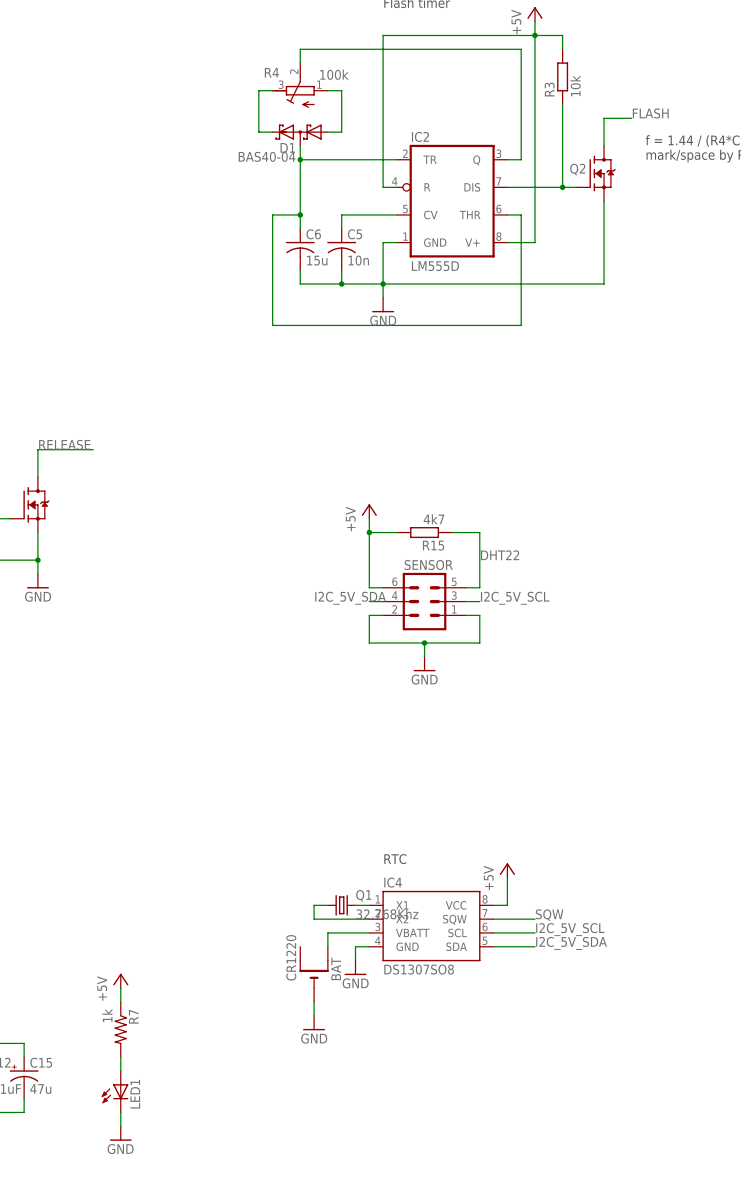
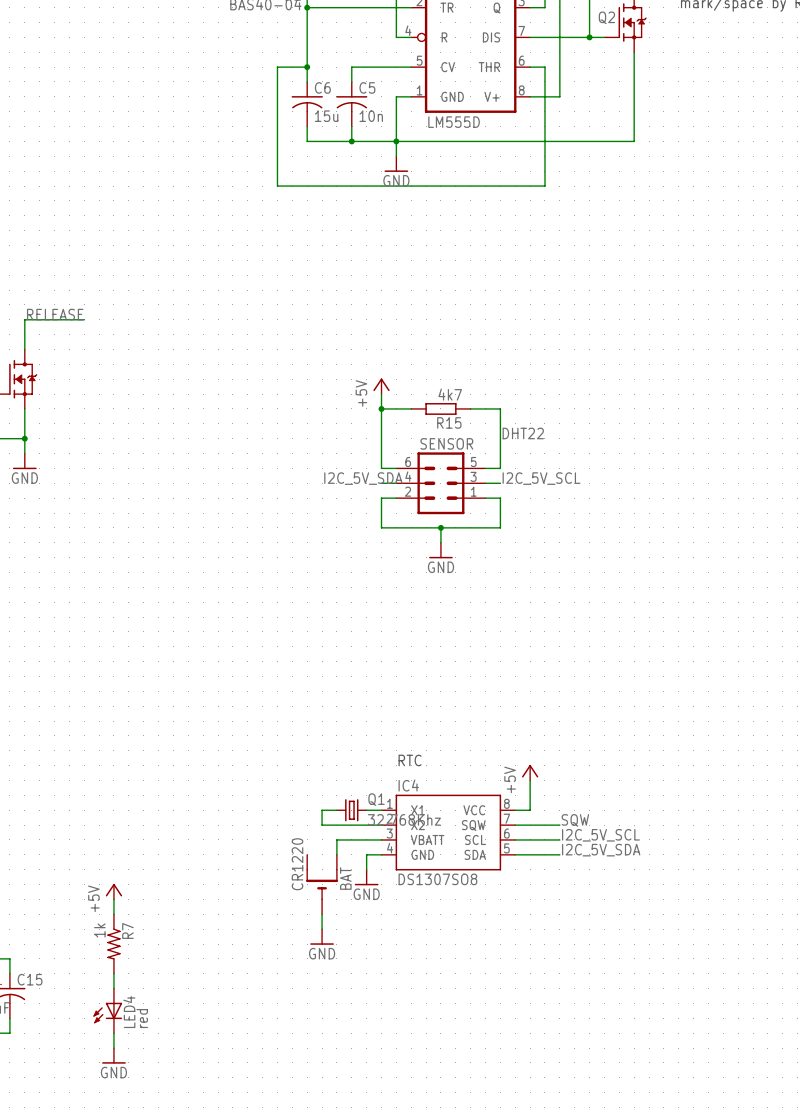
C15 value: 47u (40, 1089) -> none
LED1 name: LED1 (135, 1094) -> LED4 (129, 1012)
LED1 value: none -> red (142, 1018)

